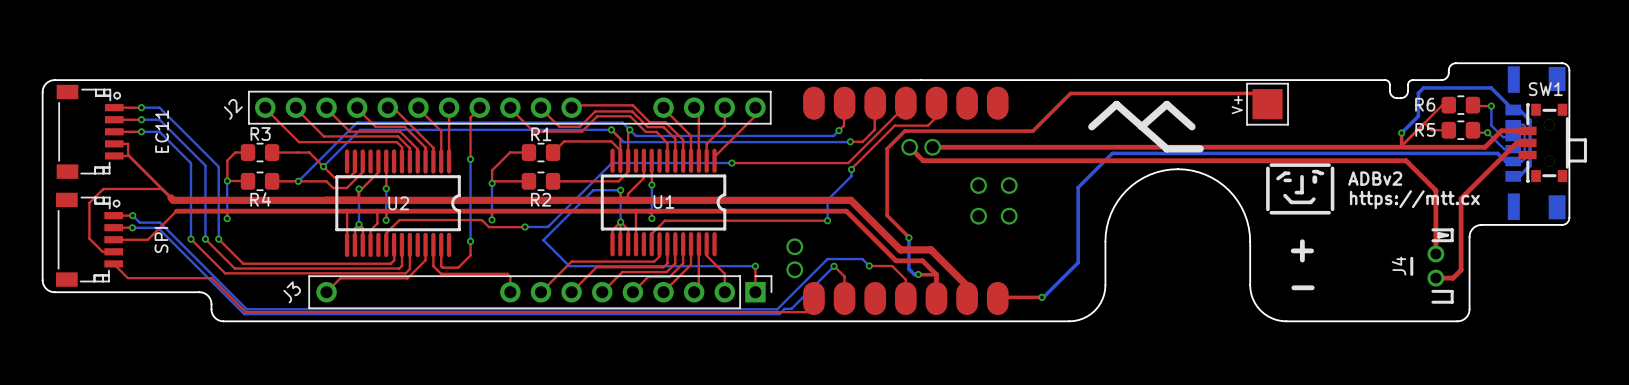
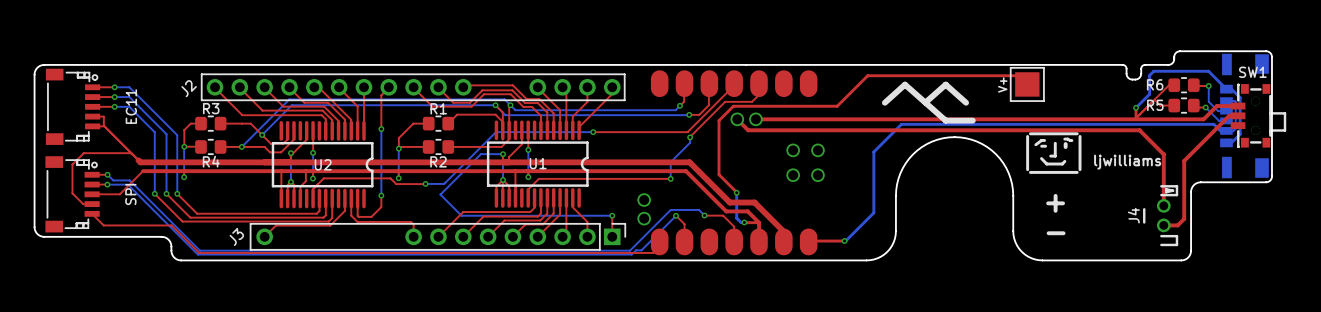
text: ADBv2 (1375, 178) -> none
text: https://mtt.cx (1414, 199) -> ljwilliams (1127, 162)

